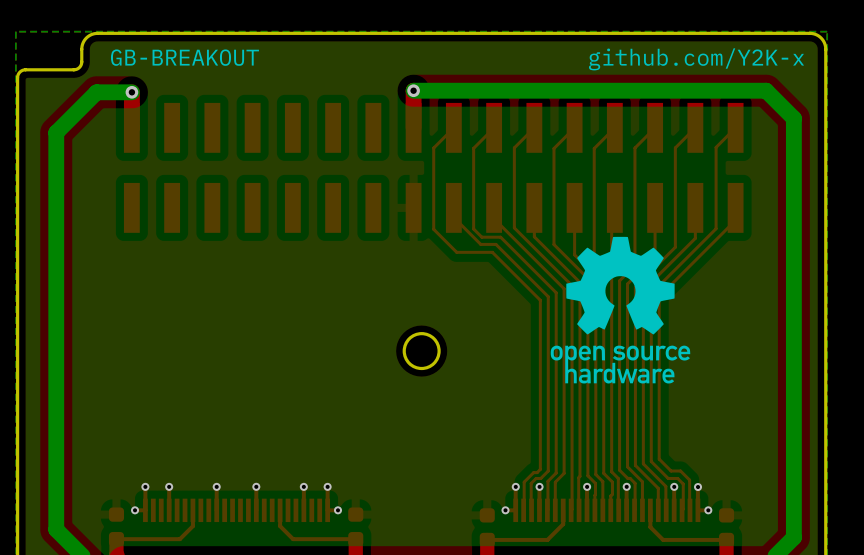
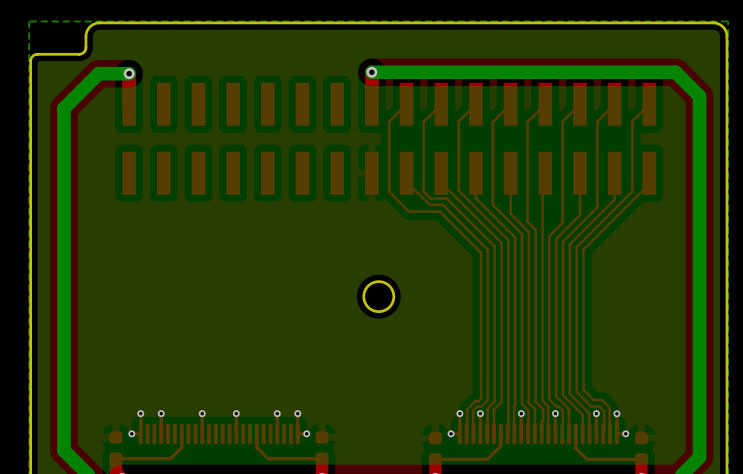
text: GB-BREAKOUT (184, 57) -> none
text: github.com/Y2K-x (696, 59) -> none
drawing: [550, 236, 691, 384] -> none

